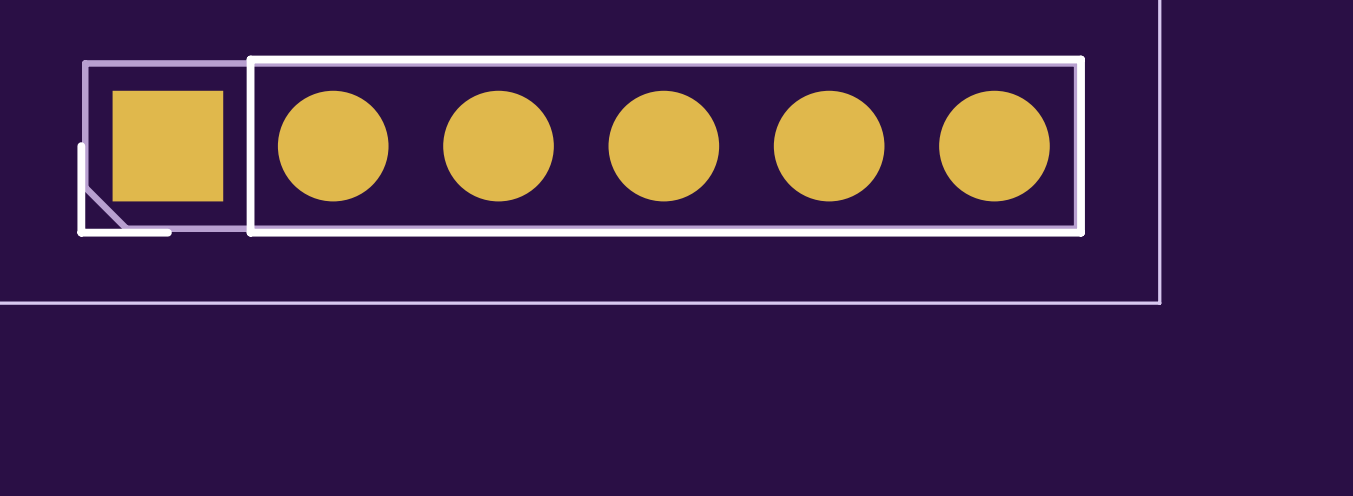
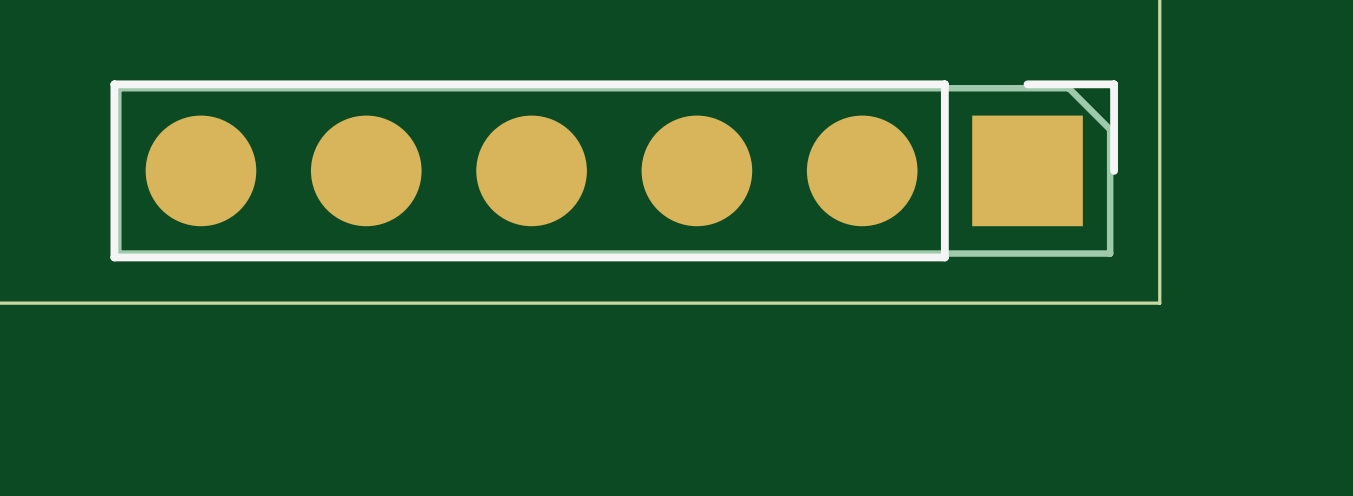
part rotation: 0° (581, 146) -> 180° (614, 170)

